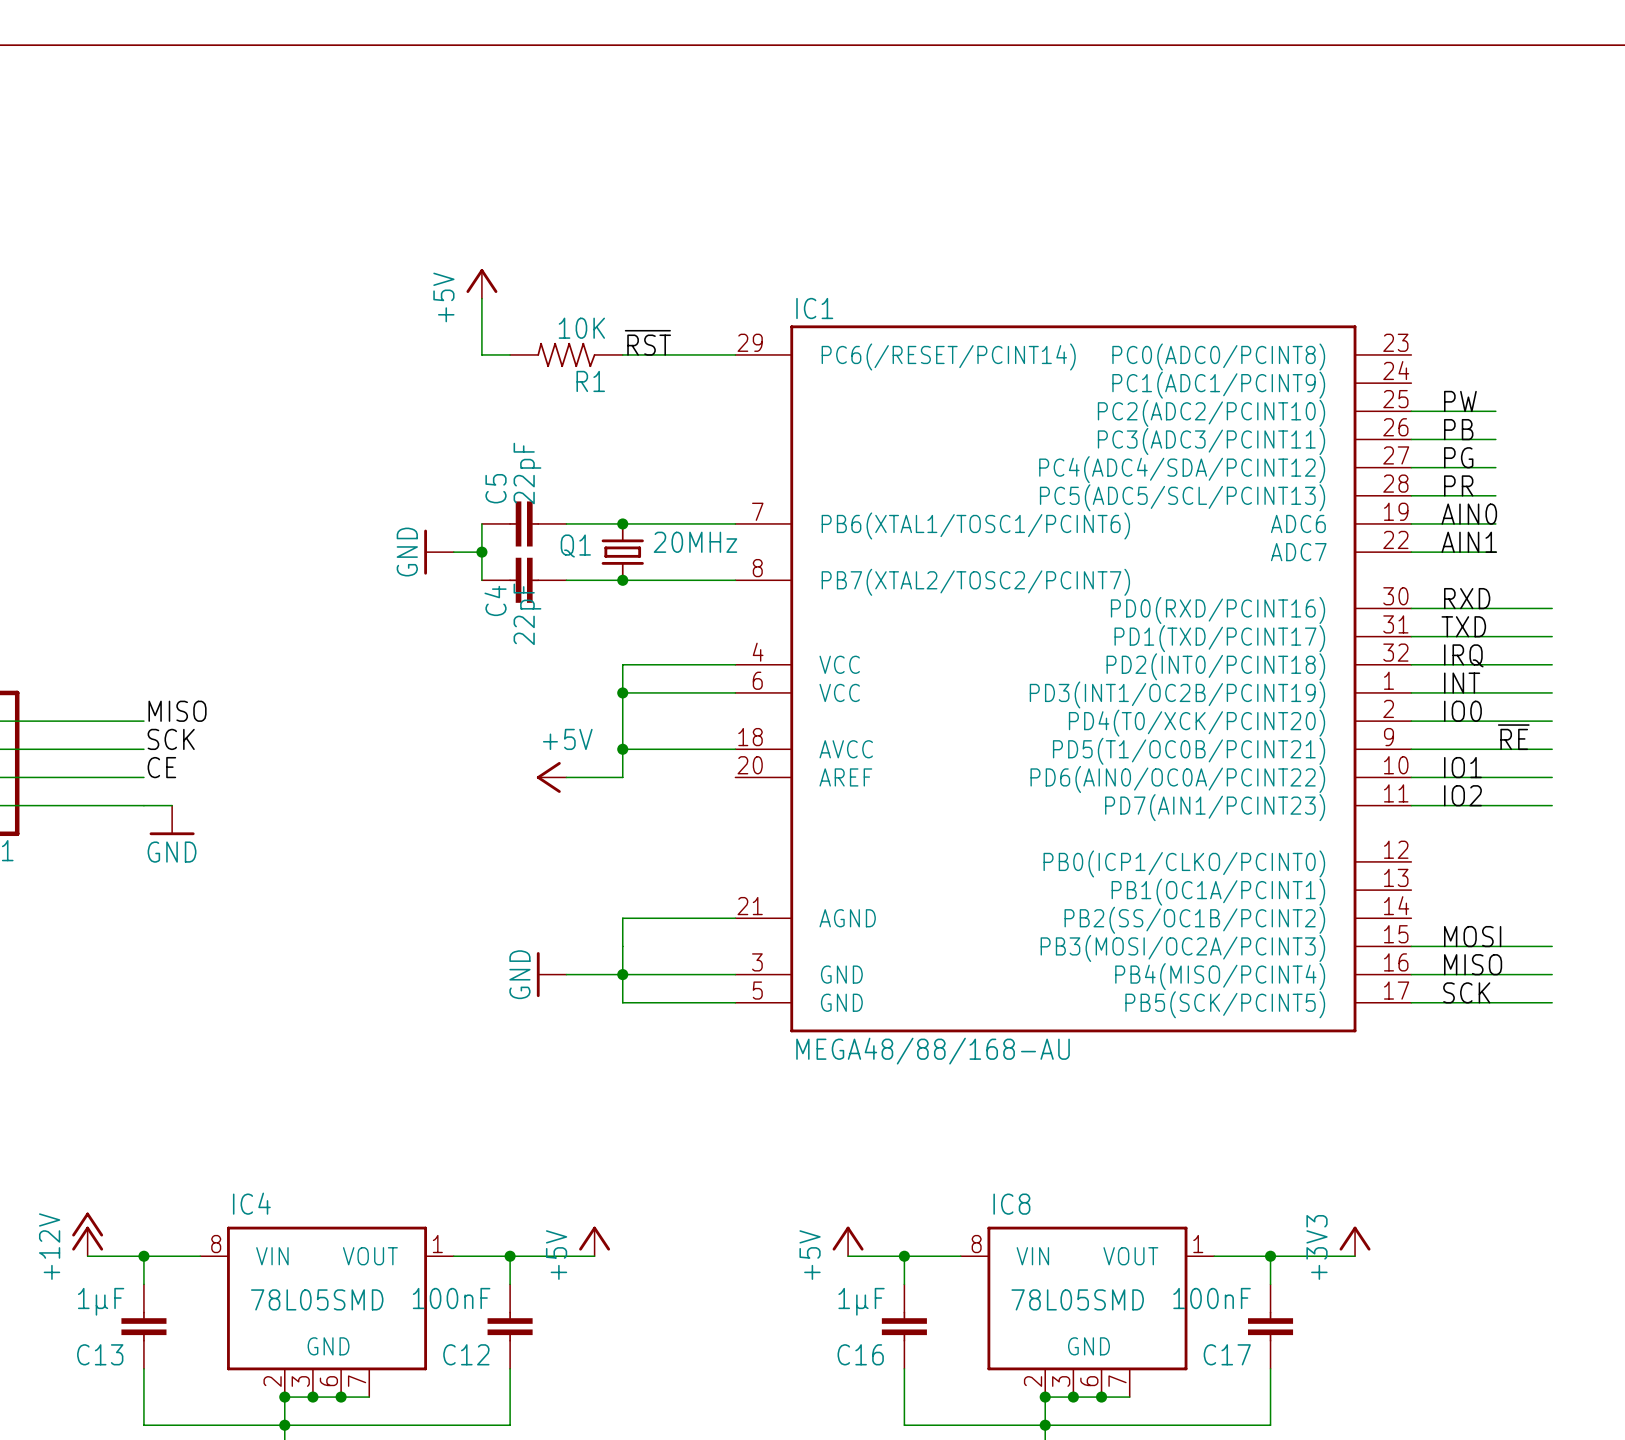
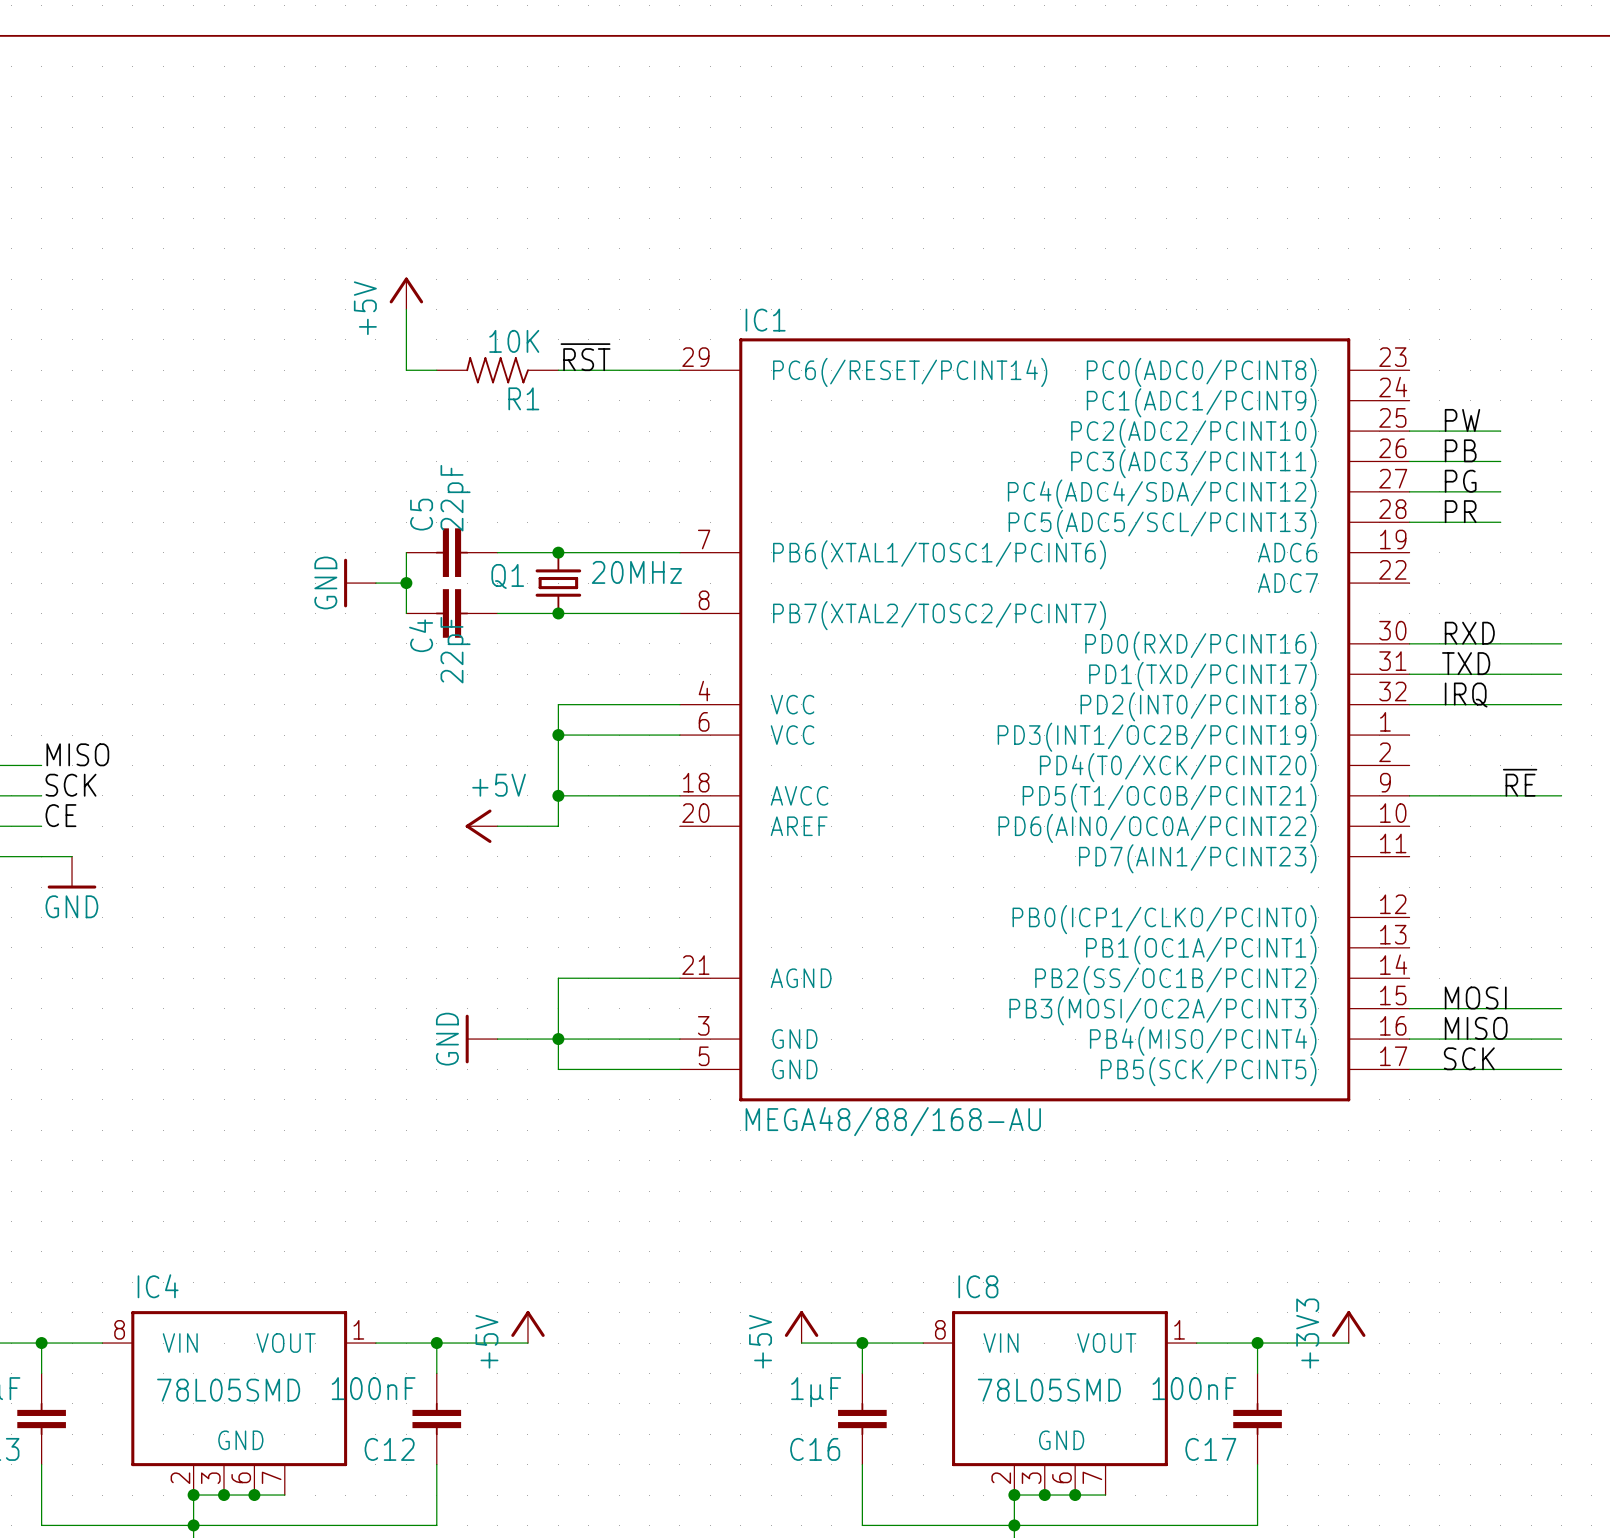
label: AIN0 (1469, 514) -> none
wire: (1411, 523) (1495, 523) -> none
label: AIN1 (1469, 542) -> none
wire: (1411, 552) (1495, 552) -> none
label: INT (1462, 683) -> none
wire: (1411, 692) (1552, 692) -> none
label: IO0 (1462, 711) -> none
wire: (1411, 721) (1552, 721) -> none
label: IO1 (1462, 767) -> none
wire: (1411, 777) (1552, 777) -> none
label: IO2 (1462, 795) -> none
wire: (1411, 805) (1552, 805) -> none

